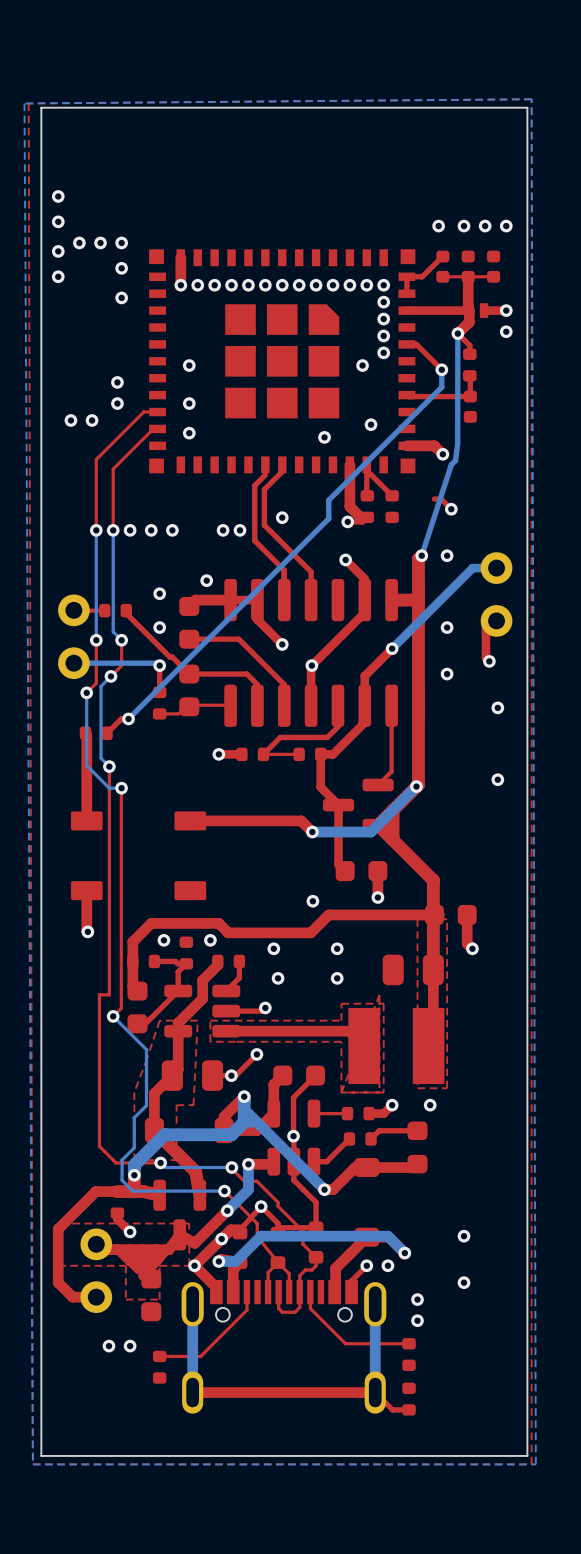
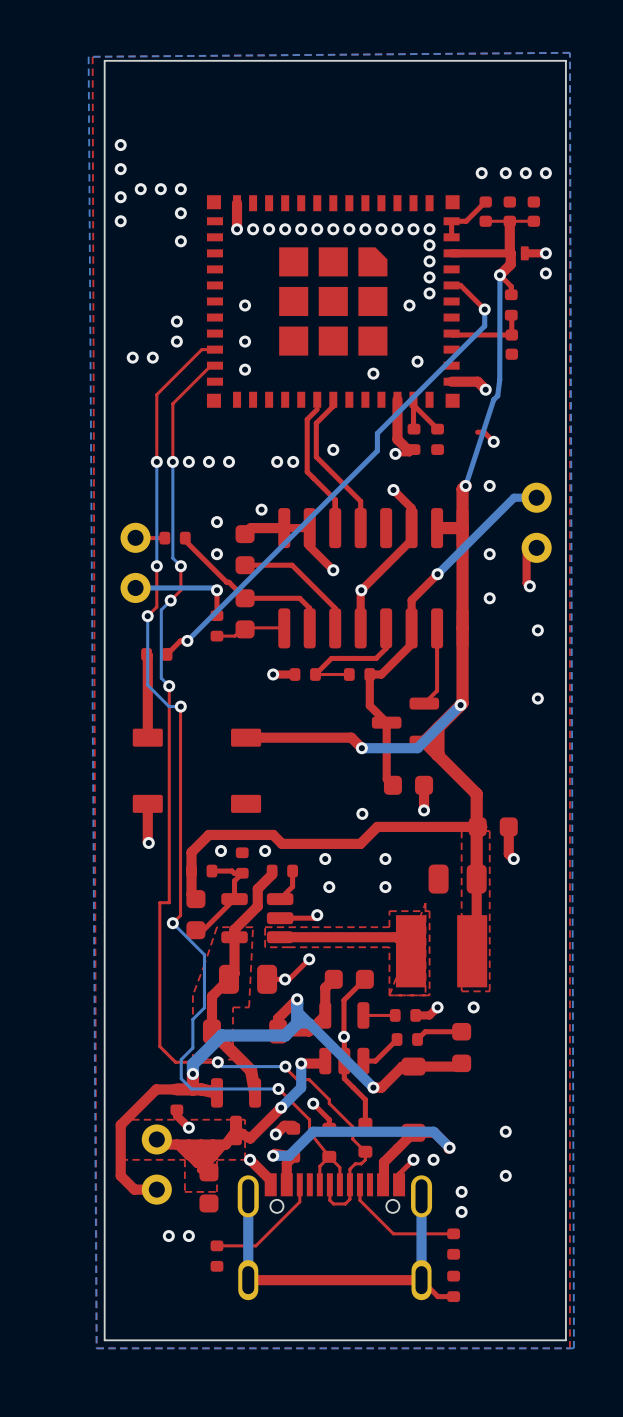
top track: (261, 1206) (240, 1229) -> none
top track: (316, 1227) (278, 1227) -> none
top track: (221, 1238) (194, 1265) -> none

